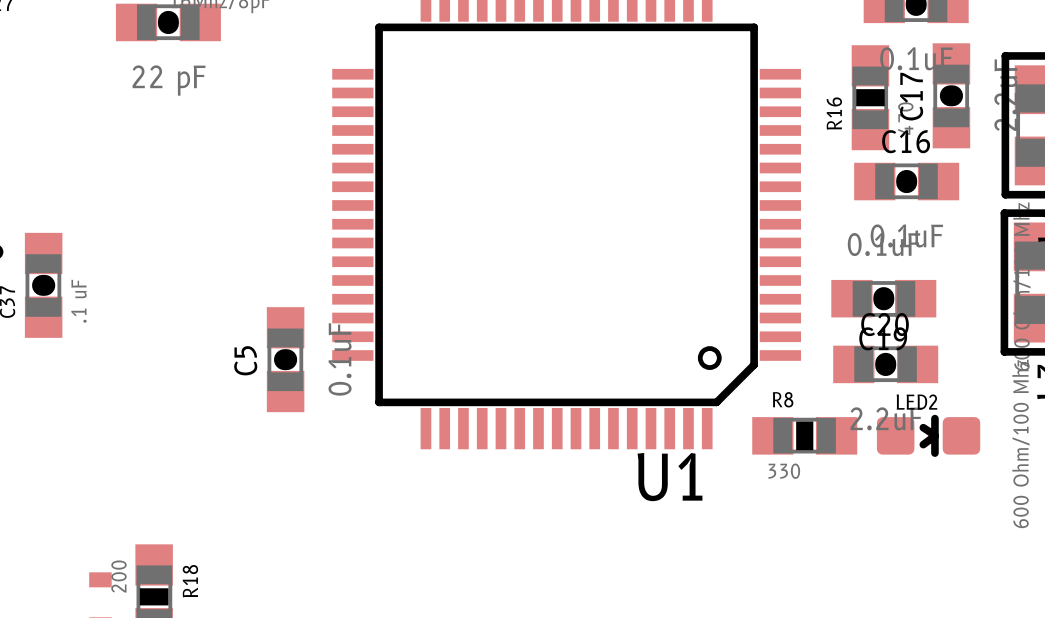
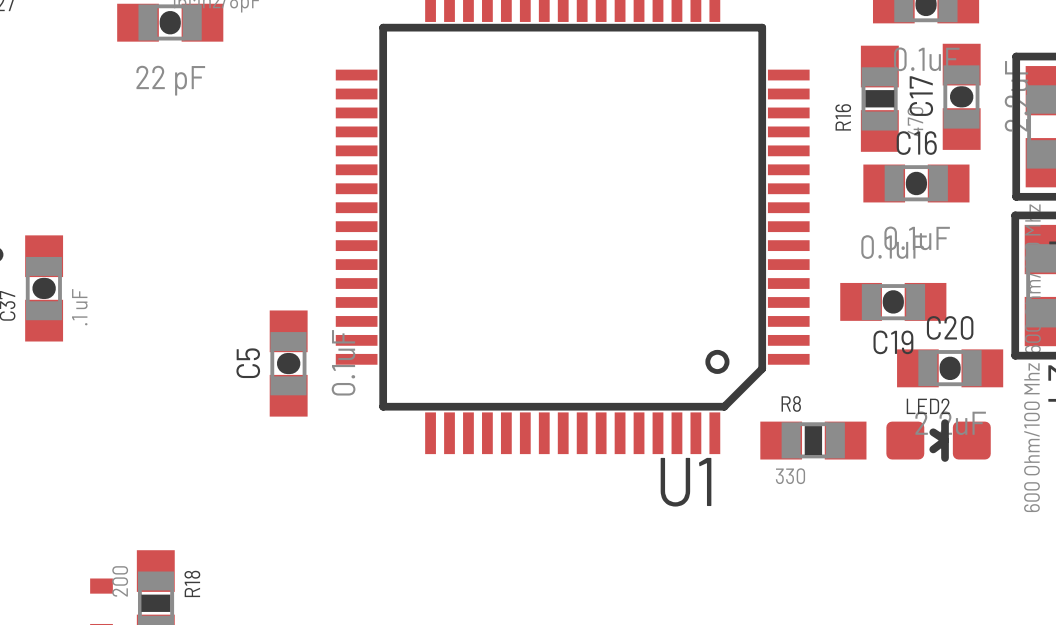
C20 position: (885, 364) -> (950, 368)

